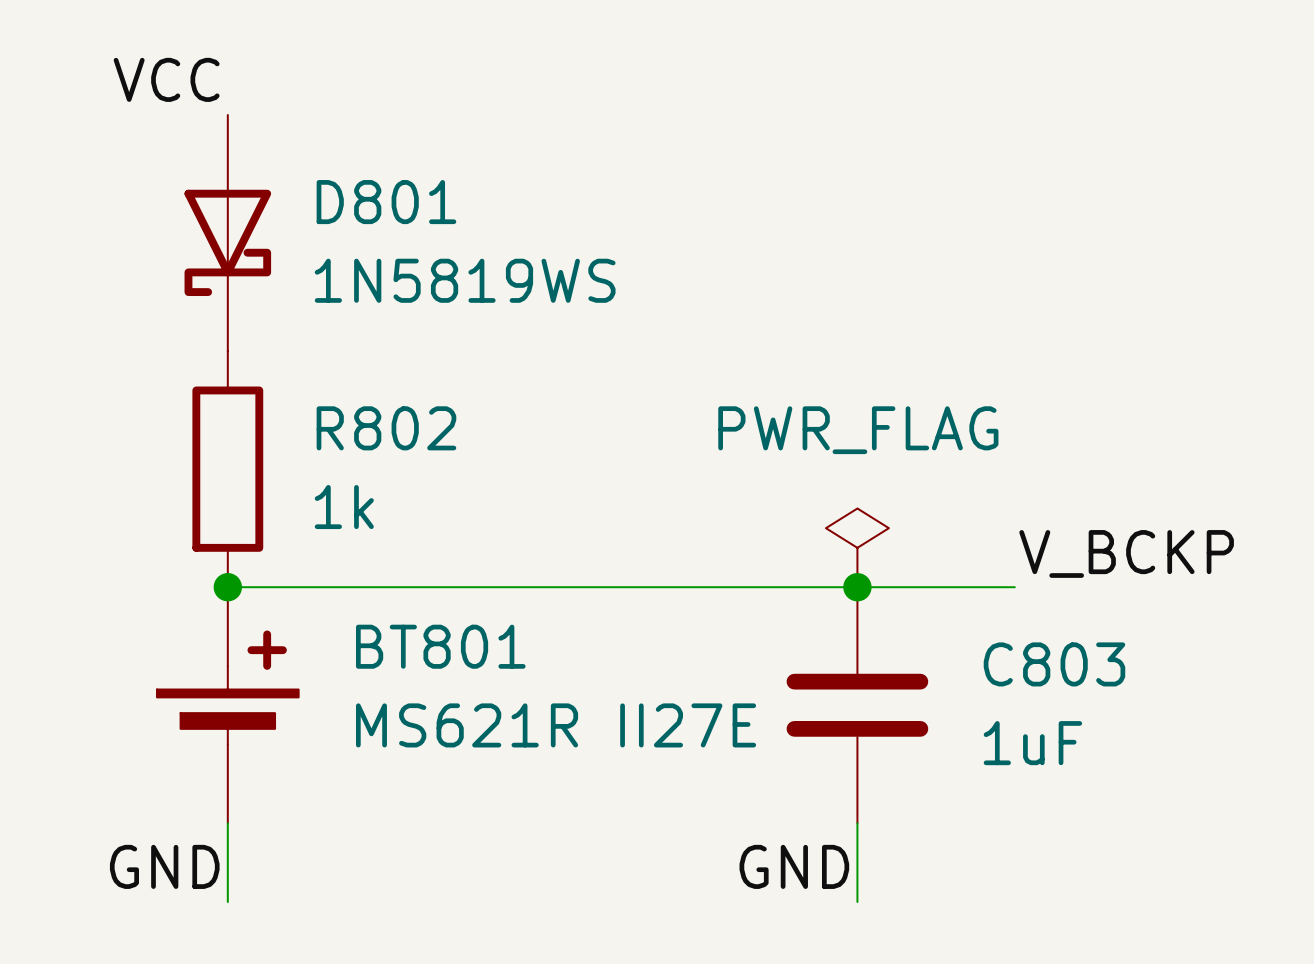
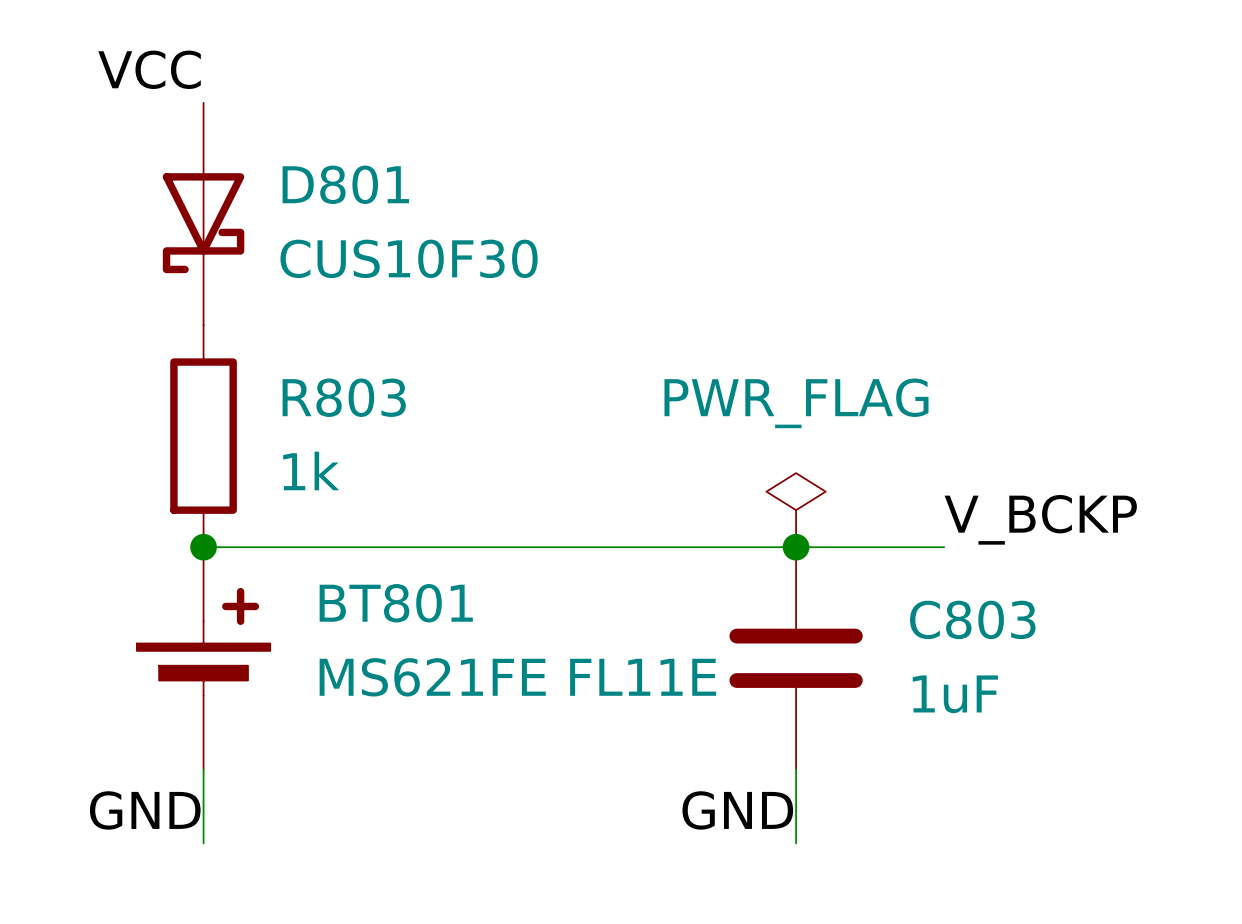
D801 value: 1N5819WS (465, 280) -> CUS10F30 (409, 258)
R802 name: R802 (386, 428) -> R803 (344, 397)
BT801 value: MS621R II27E (556, 725) -> MS621FE FL11E (517, 677)

